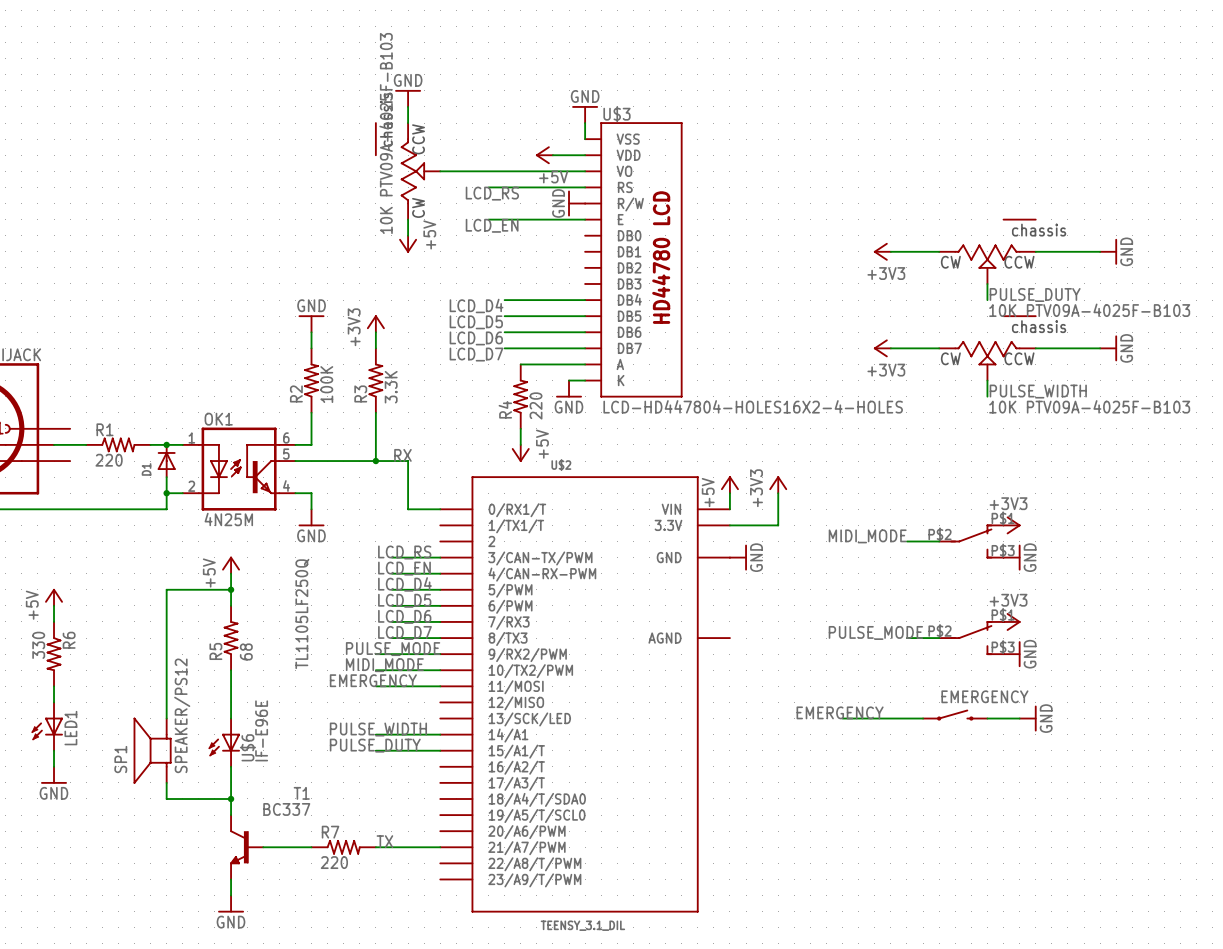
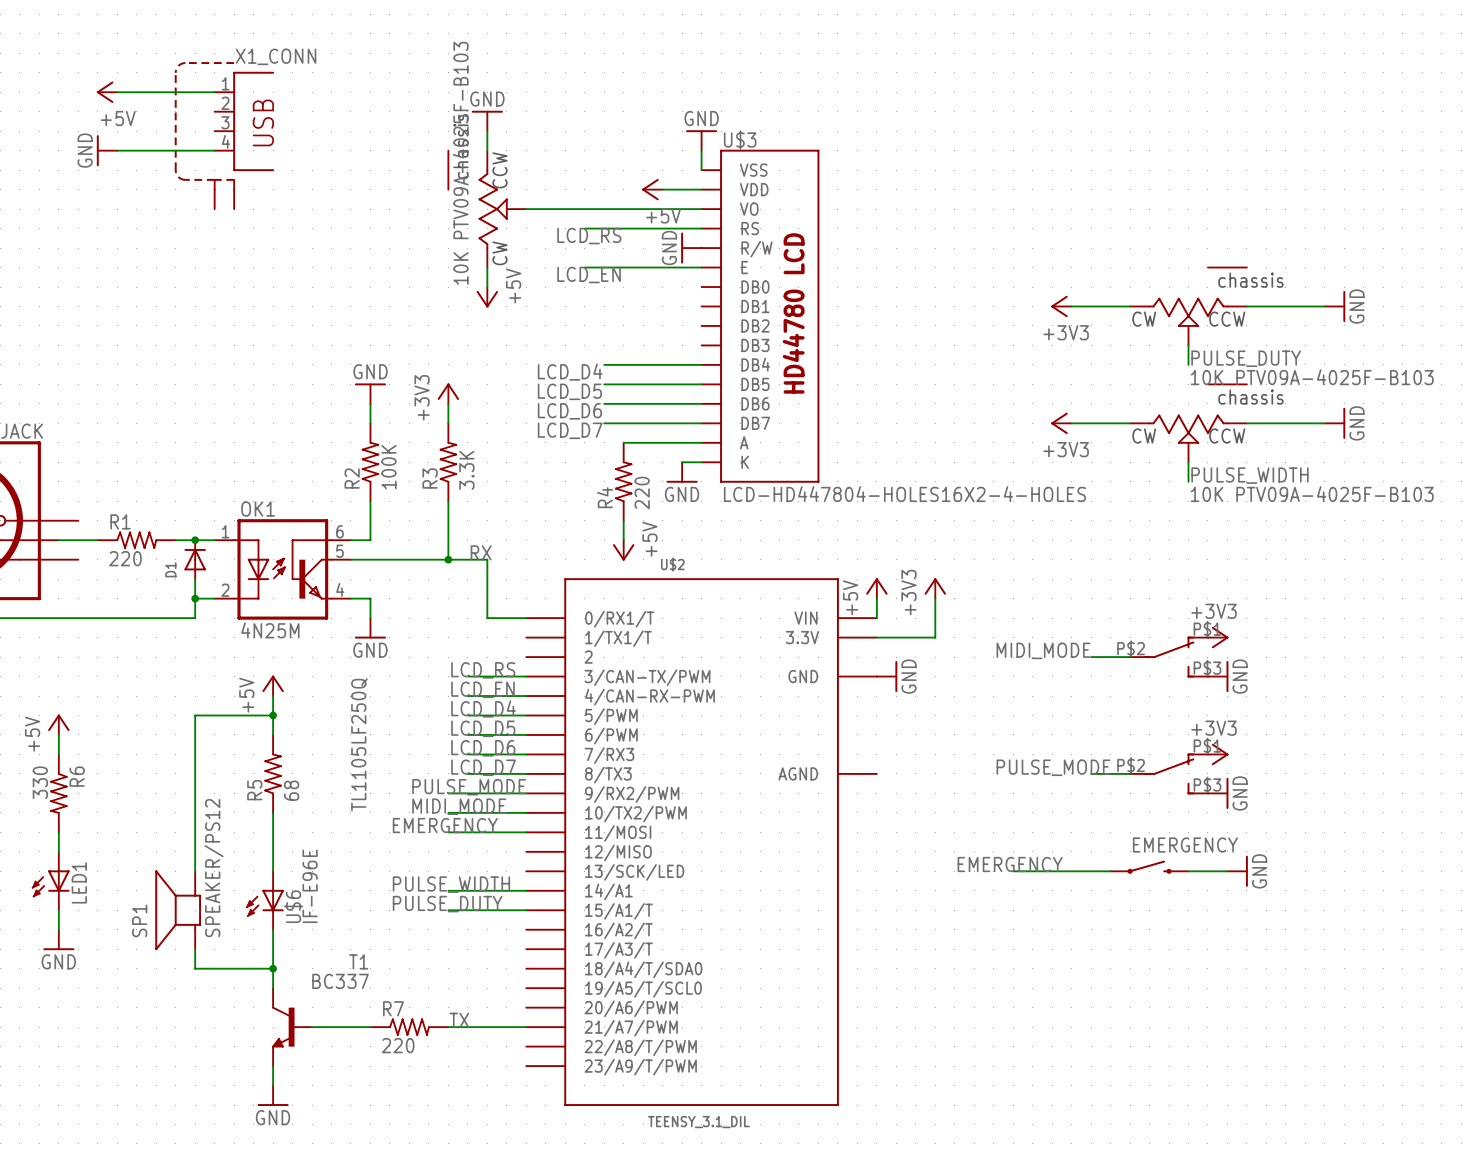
power symbol: none -> +5V (107, 92)
wire: none -> (117, 92) (214, 92)
X1_CONN: none -> (244, 121)
part: none -> (204, 135)
power symbol: none -> GND (107, 150)
wire: none -> (117, 150) (214, 150)

